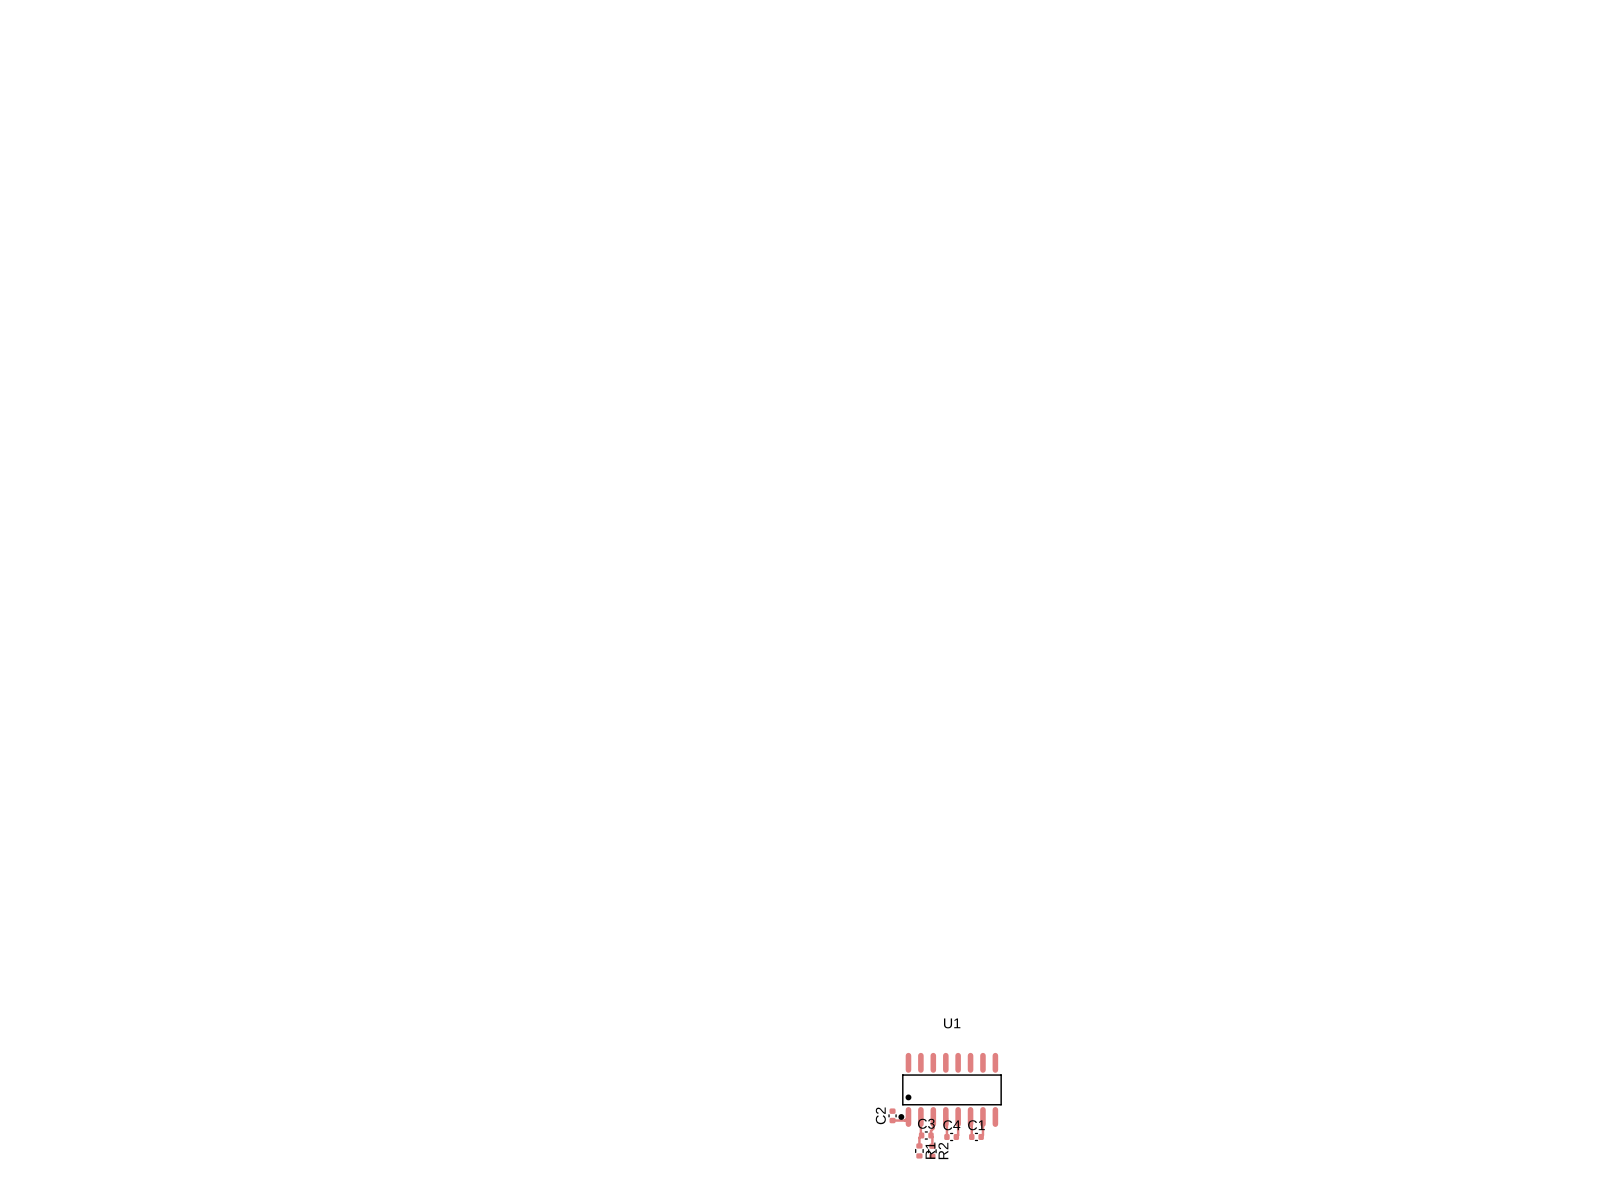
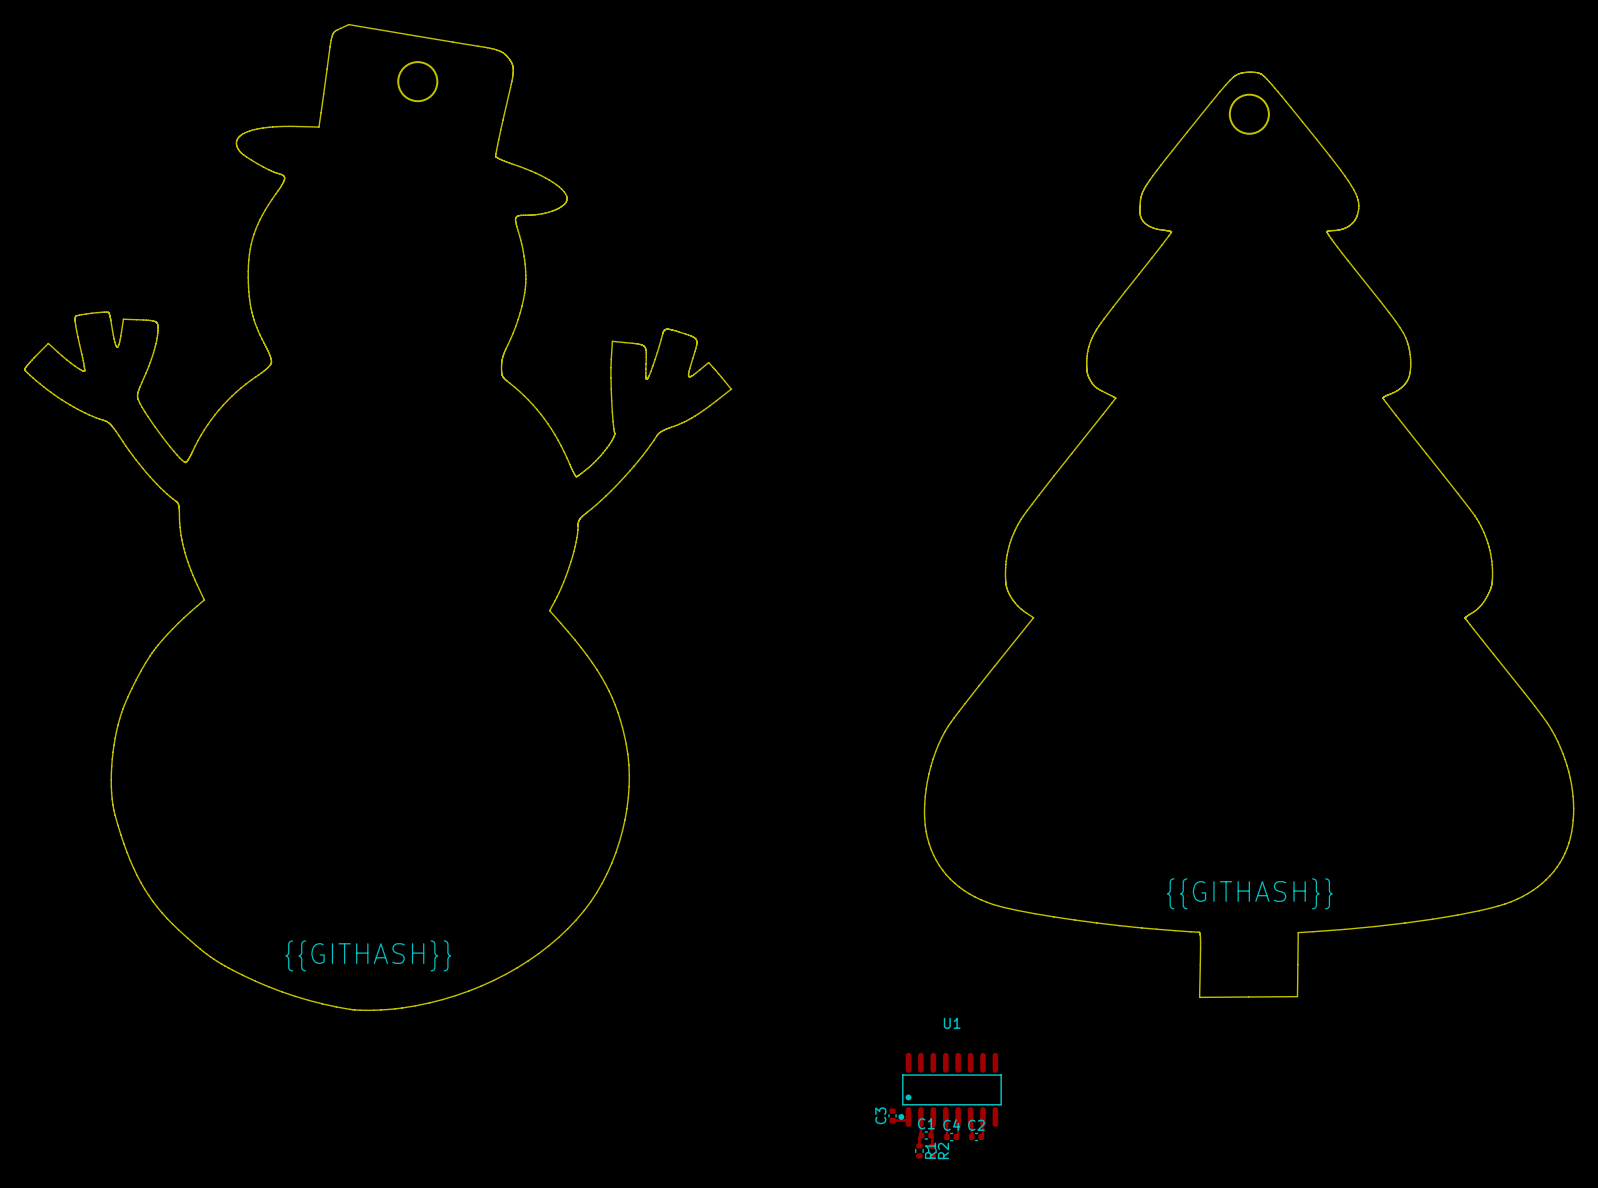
round board edge: none -> [397, 61, 439, 103]
round board edge: none -> [1228, 93, 1270, 135]
board edge: none -> (495, 156) (513, 72) (511, 63) (504, 54) (487, 47) (348, 24) (334, 31) (330, 43) (318, 127) (260, 128) (244, 133) (236, 140) (237, 147) (242, 153) (284, 177) (257, 224) (252, 239) (248, 259) (248, 287) (251, 308) (271, 362) (265, 369) (236, 392) (219, 409) (204, 429) (186, 462)
board edge: none -> (495, 156) (545, 177) (559, 187) (566, 196) (564, 203) (554, 210) (538, 214) (519, 215) (515, 217) (524, 260) (525, 286) (518, 319) (502, 357) (501, 370) (504, 378) (528, 400) (548, 423) (576, 476)
board edge: none -> (1171, 231) (1151, 227) (1142, 220) (1140, 206) (1143, 190) (1161, 164) (1225, 85) (1236, 75) (1249, 72) (1260, 73) (1271, 84) (1330, 156) (1355, 193) (1358, 208) (1354, 221) (1344, 228) (1327, 231)
board edge: none -> (1171, 231) (1100, 323) (1089, 344) (1086, 363) (1089, 377) (1096, 387) (1115, 398)
board edge: none -> (1327, 231) (1395, 321) (1407, 341) (1410, 359) (1408, 377) (1400, 388) (1383, 397)
board edge: none -> (108, 312) (75, 316) (84, 370)
board edge: none -> (108, 312) (117, 347) (123, 319) (150, 320) (157, 323) (155, 346) (137, 397) (162, 437) (185, 462)
board edge: none -> (24, 369) (48, 343) (71, 363) (84, 371)
board edge: none -> (24, 369) (62, 400) (85, 413) (108, 423) (146, 472) (177, 502) (184, 552) (204, 599) (172, 628) (149, 656) (127, 697) (116, 731) (111, 773) (112, 804) (124, 844) (140, 882) (152, 901) (172, 924) (203, 951) (224, 965) (255, 981) (295, 996) (336, 1006) (366, 1010) (402, 1008) (442, 999) (481, 986) (517, 967) (548, 945) (576, 919) (596, 892) (611, 863) (622, 830) (628, 797) (628, 764) (622, 727) (612, 698) (597, 669) (549, 610) (569, 566) (580, 518) (625, 476) (659, 433) (694, 416) (731, 389) (708, 362) (689, 376) (696, 340) (690, 335) (669, 329) (663, 331) (646, 379)
board edge: none -> (646, 379) (646, 352) (644, 346) (612, 341) (611, 389) (614, 435) (598, 458) (576, 476)
board edge: none -> (1115, 398) (1032, 503) (1016, 527) (1007, 554) (1006, 586) (1015, 603) (1033, 617) (948, 725) (938, 744) (930, 766) (924, 811) (929, 843) (942, 870) (954, 883) (969, 893) (993, 904) (1034, 913) (1119, 925) (1199, 932) (1199, 997) (1297, 996) (1298, 932) (1375, 926) (1432, 919) (1489, 908) (1522, 896) (1550, 875) (1560, 862) (1567, 848) (1573, 814) (1570, 778) (1560, 747) (1547, 723) (1465, 617)
board edge: none -> (1382, 398) (1469, 508) (1485, 536) (1491, 561) (1491, 586) (1481, 605) (1465, 617)
text: none -> {{GITHASH}} (1249, 893)
text: none -> {{GITHASH}} (368, 955)
C2 name: C2 (880, 1115) -> C3 (880, 1115)
C3 name: C3 (926, 1123) -> C1 (926, 1123)
C1 name: C1 (976, 1125) -> C2 (976, 1125)

